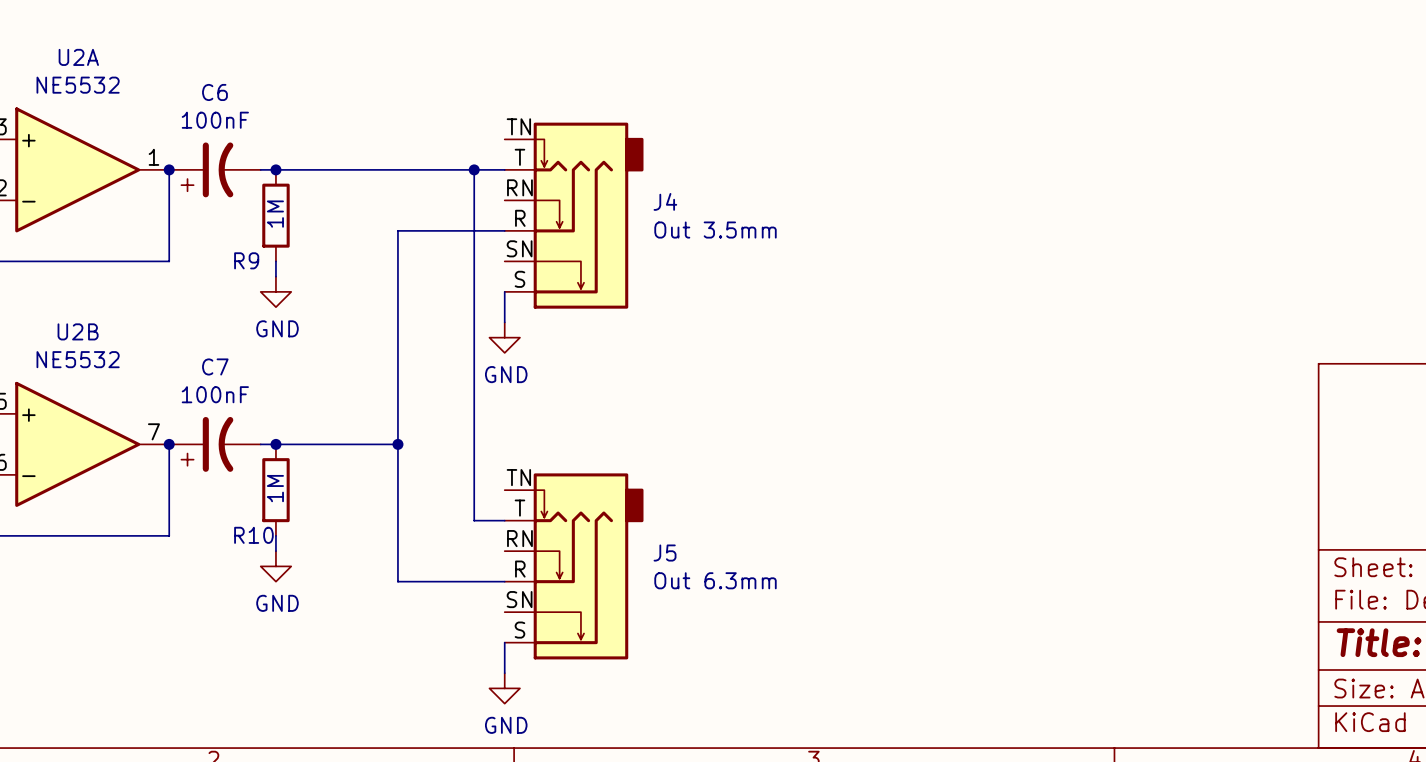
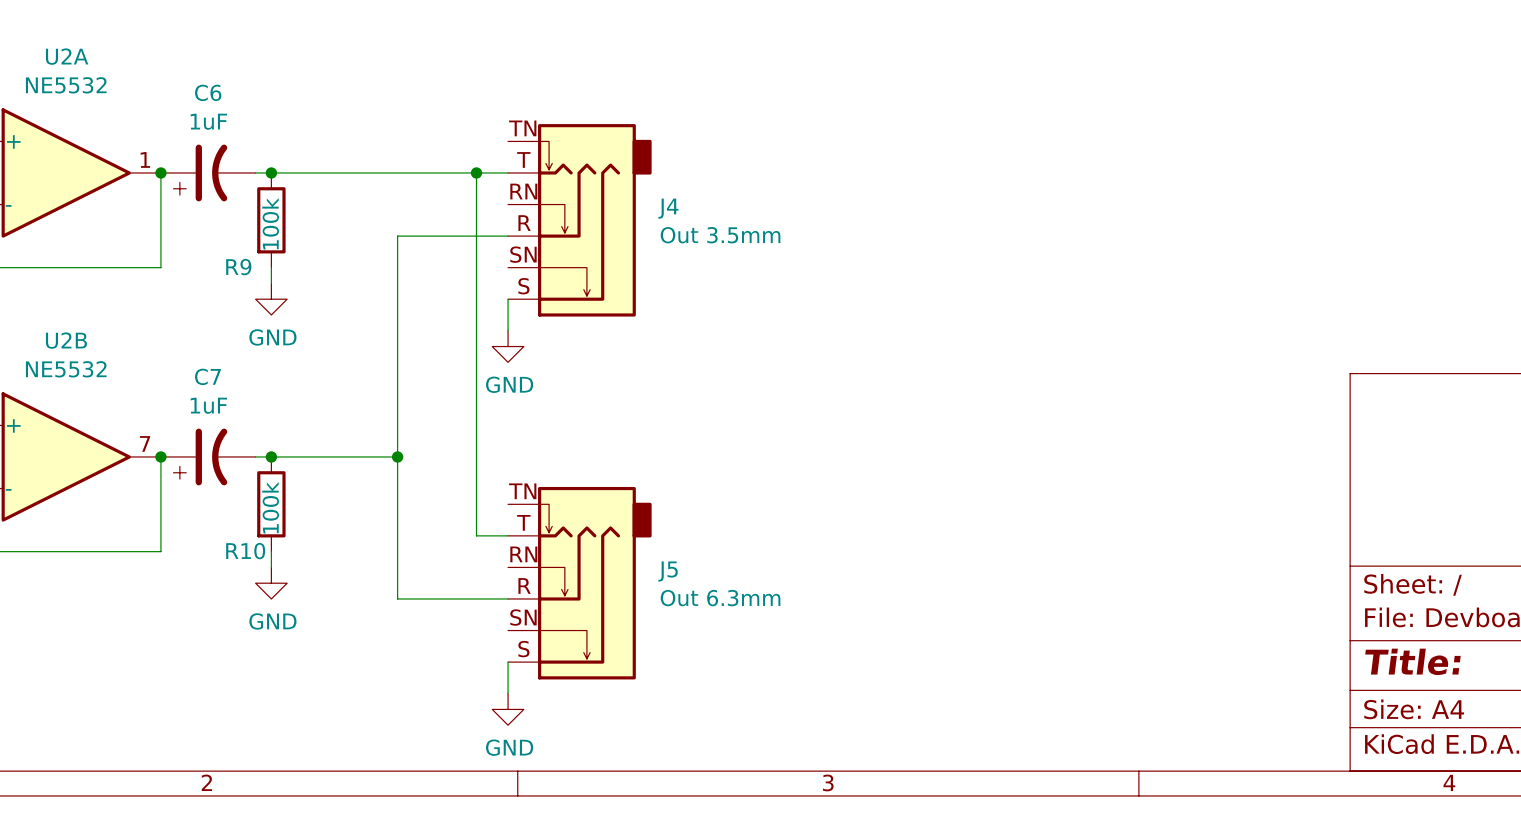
C6 value: 100nF (215, 120) -> 1uF (208, 121)
R9 value: 1M (275, 214) -> 100k (270, 223)
C7 value: 100nF (215, 394) -> 1uF (208, 405)
R10 value: 1M (275, 488) -> 100k (270, 507)

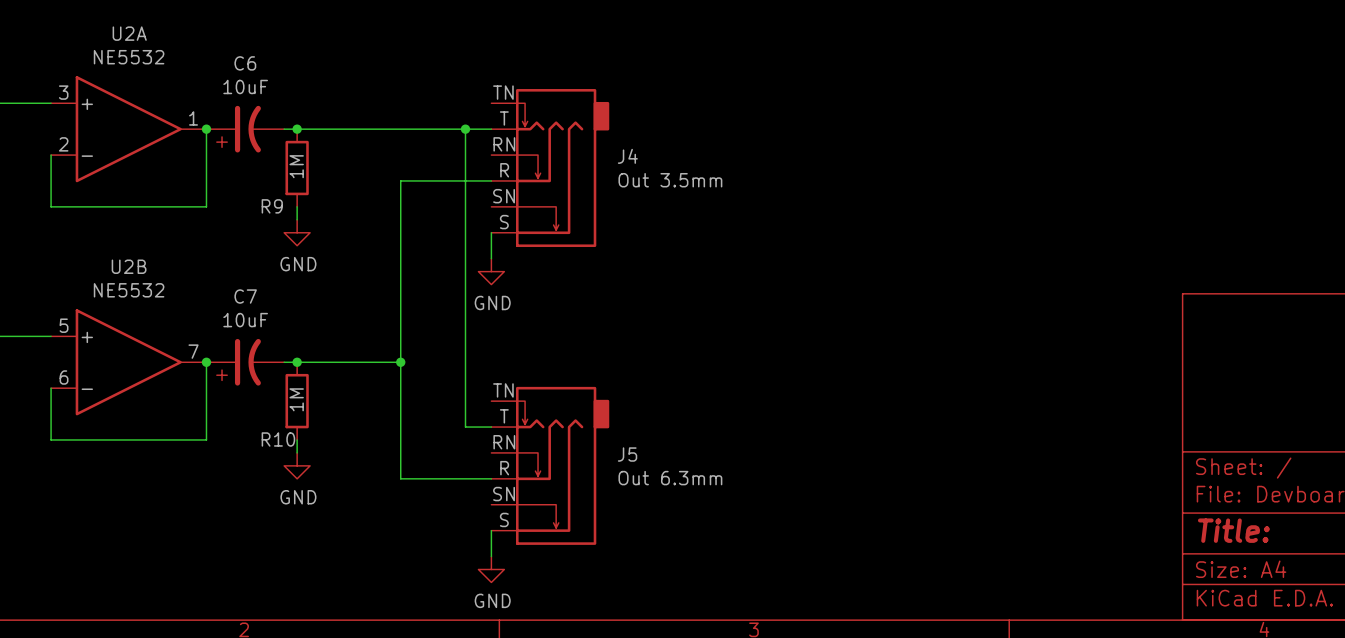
C6 value: 1uF (208, 121) -> 10uF (245, 86)
R9 value: 100k (270, 223) -> 1M (296, 166)
C7 value: 1uF (208, 405) -> 10uF (245, 320)
R10 value: 100k (270, 507) -> 1M (296, 399)

